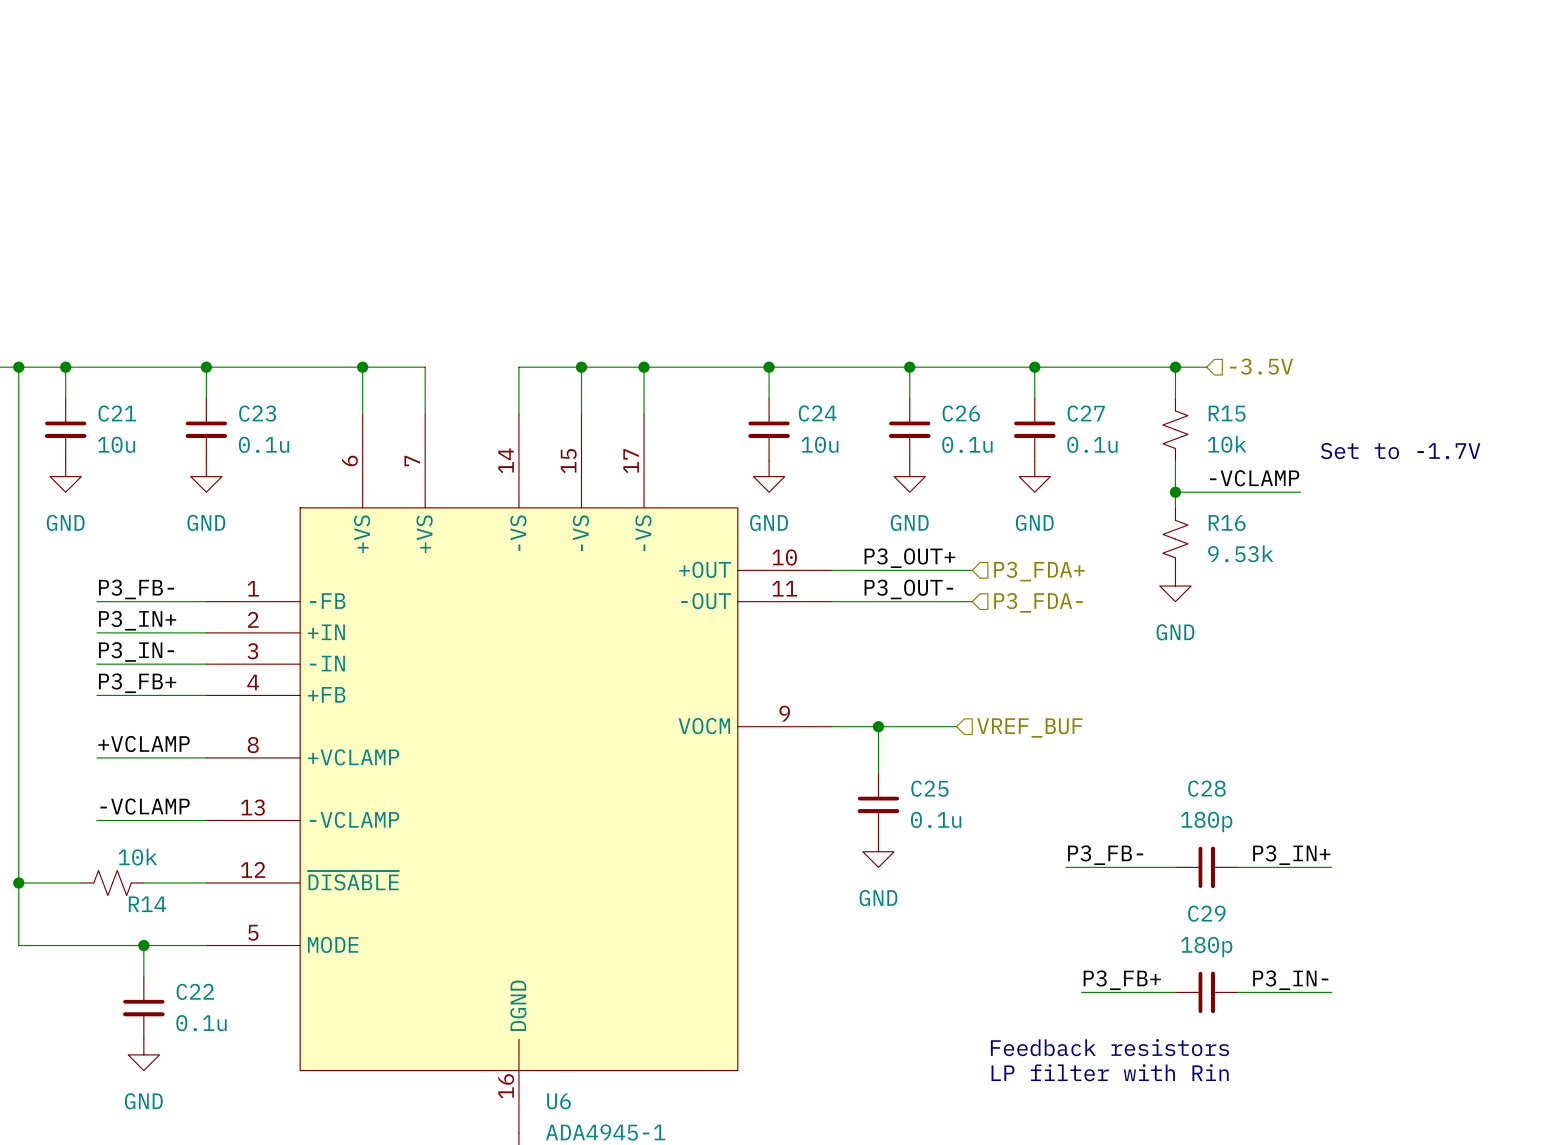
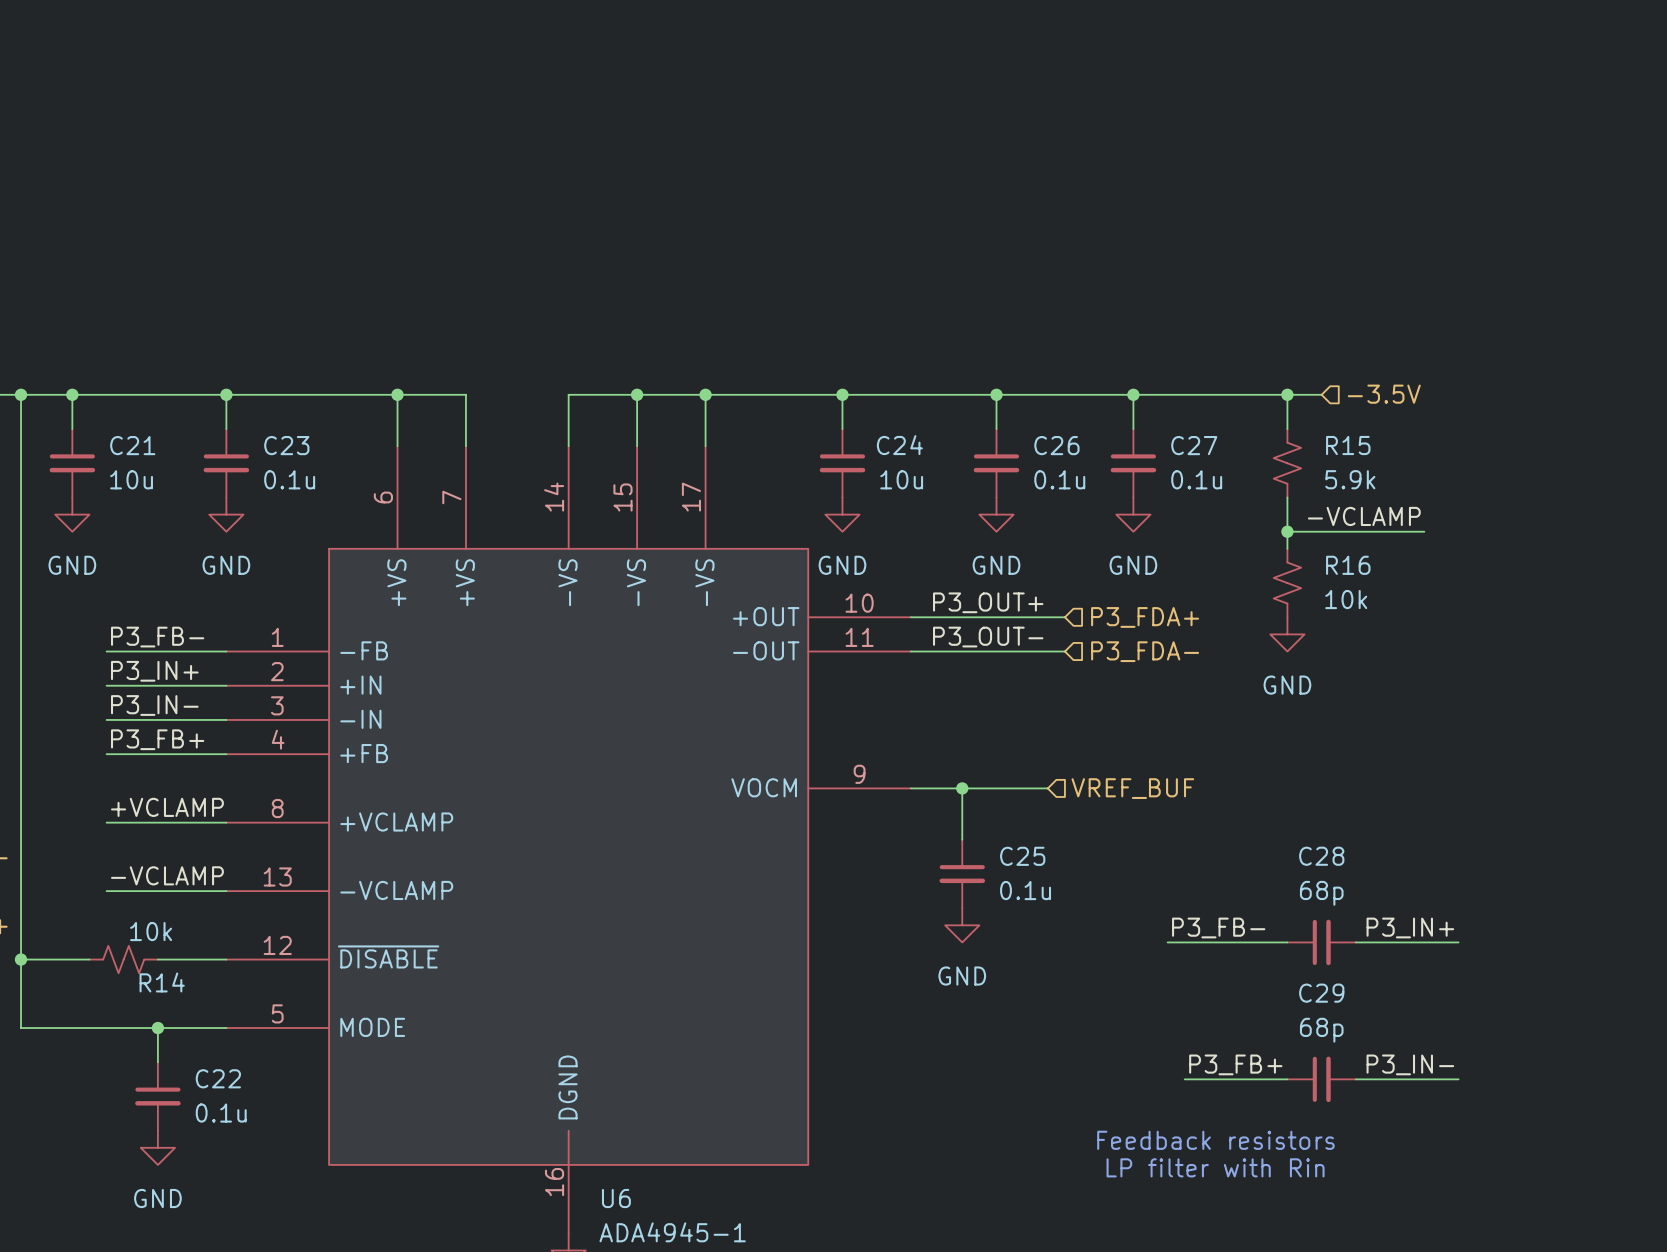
R15 value: 10k (1227, 444) -> 5.9k (1350, 479)
text: Set to -1.7V (1400, 451) -> none
R16 value: 9.53k (1240, 553) -> 10k (1346, 599)
C28 value: 180p (1206, 821) -> 68p (1321, 893)
C29 value: 180p (1206, 947) -> 68p (1321, 1030)

